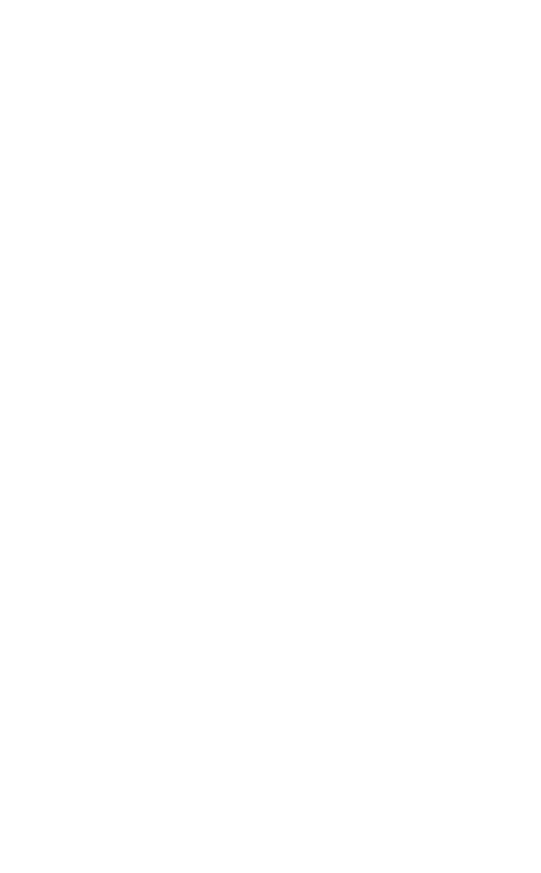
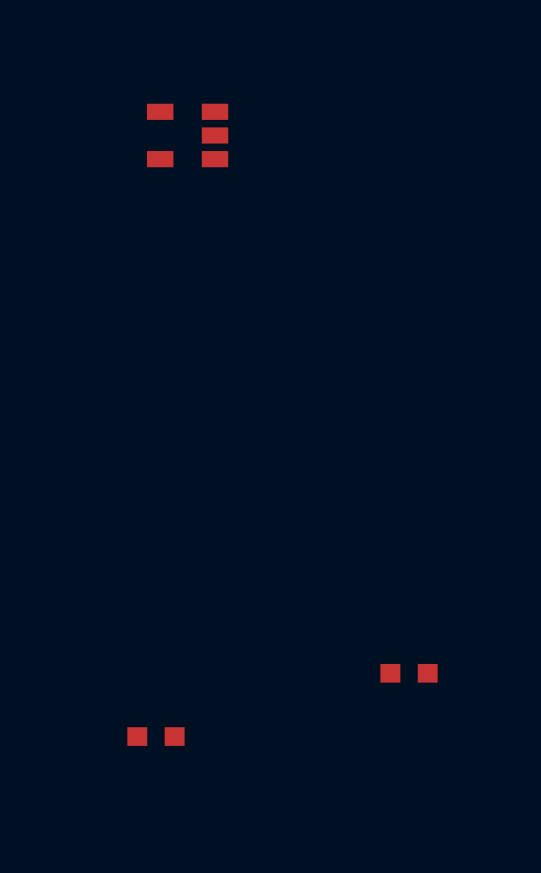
part: none -> (187, 135)
part: none -> (409, 673)
part: none -> (155, 736)

